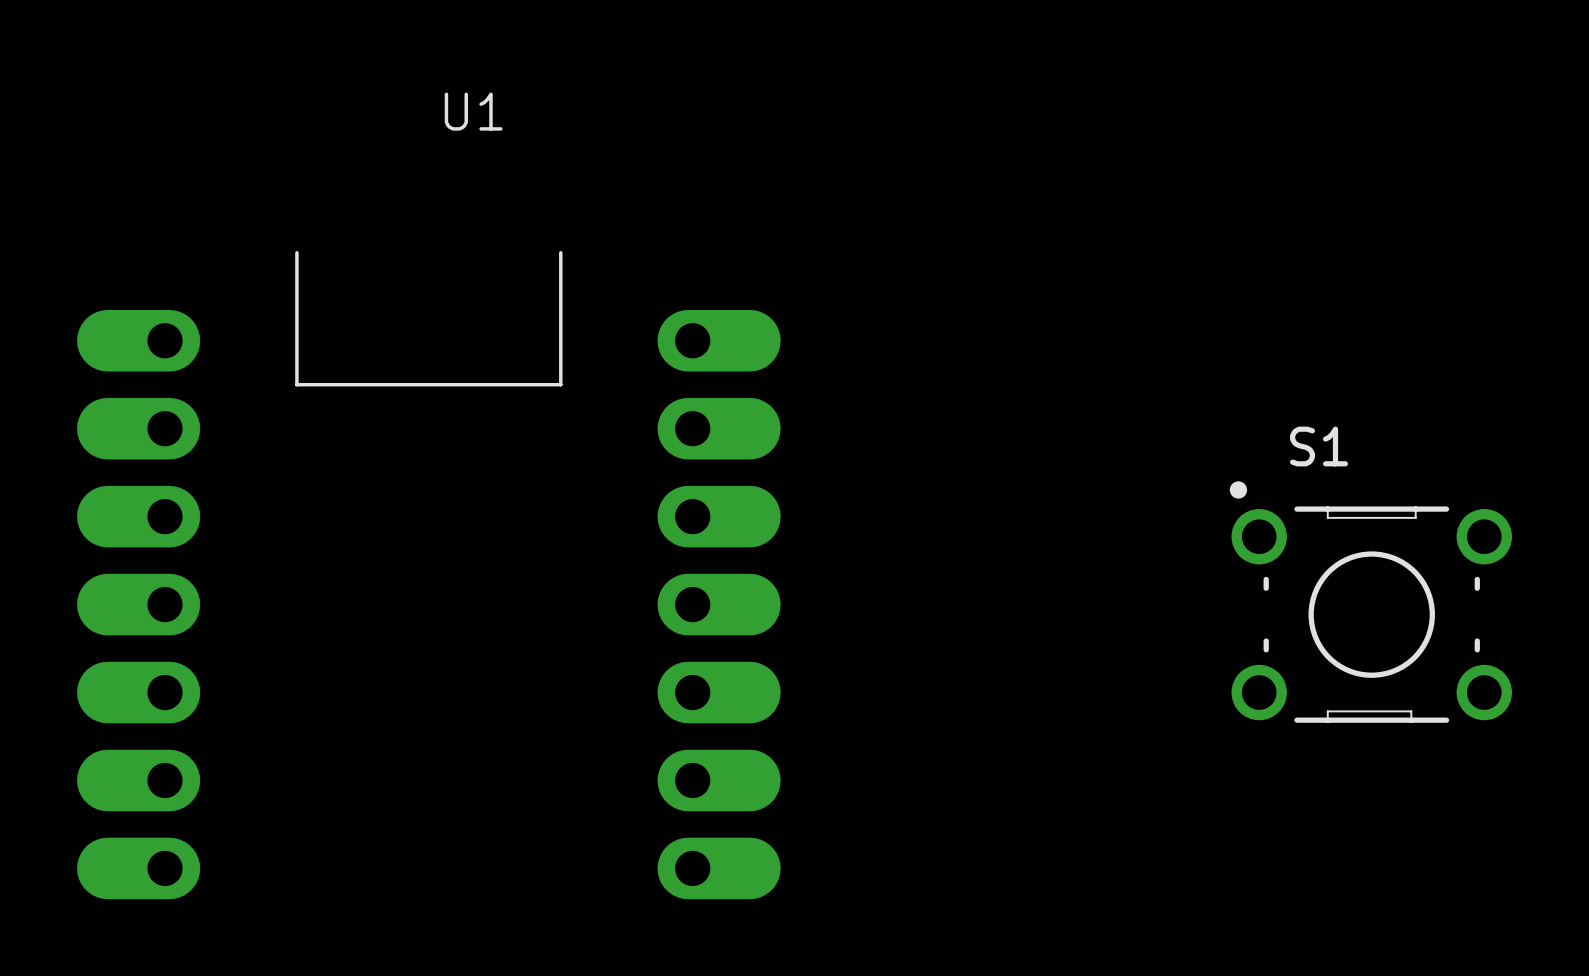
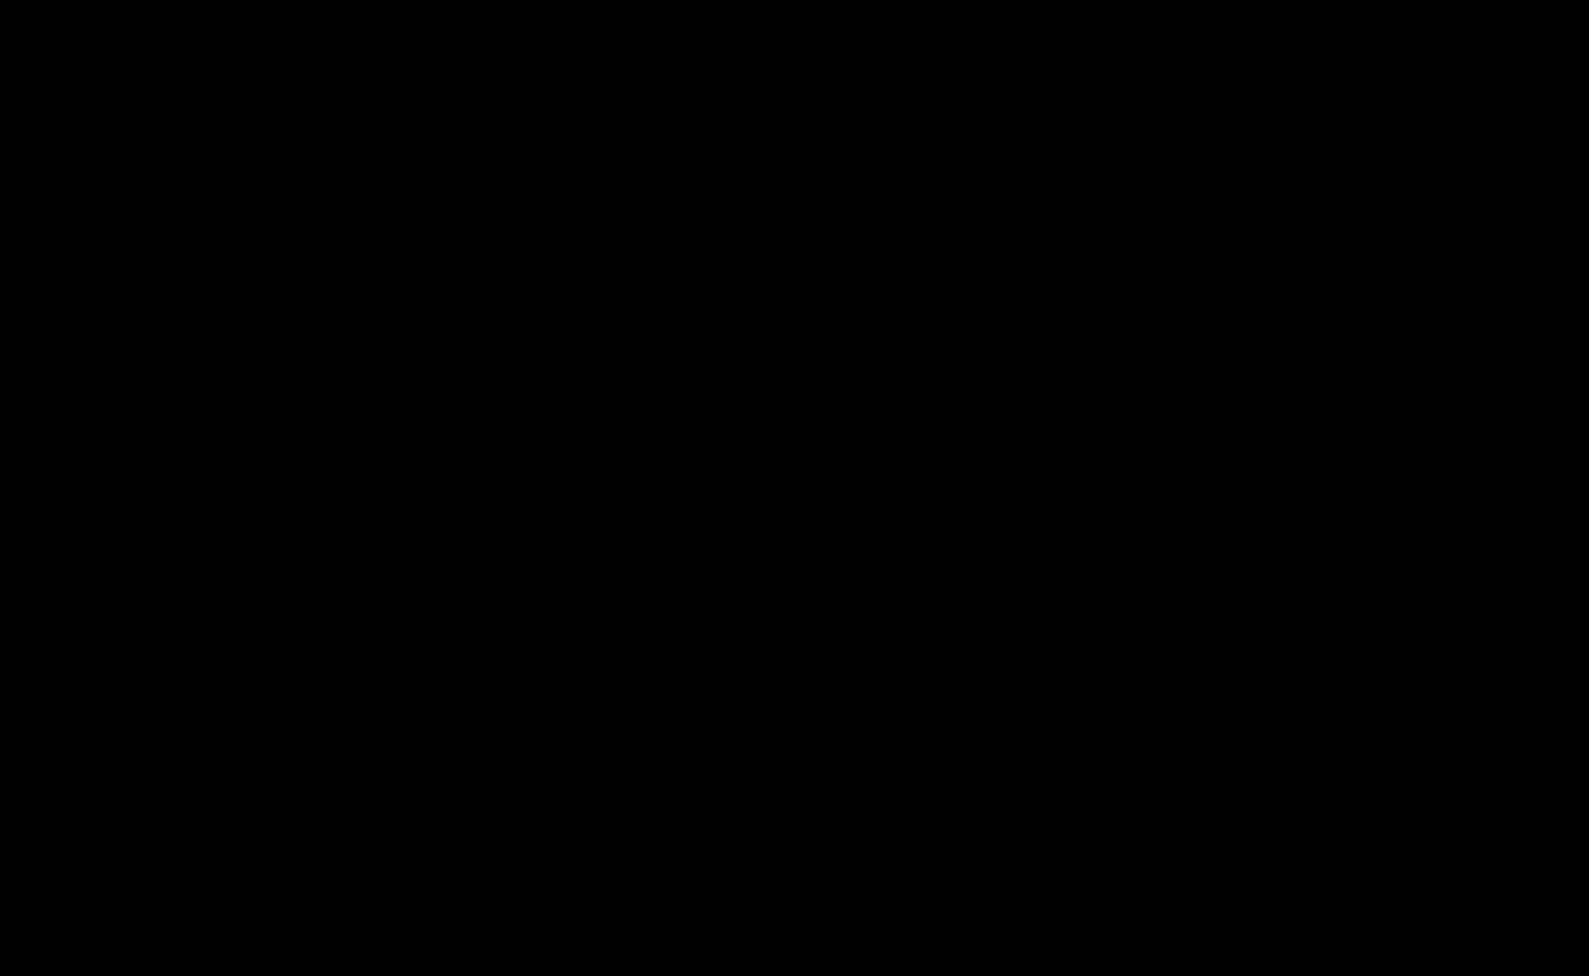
U1: (428, 575) -> none
S1: (1370, 602) -> none

